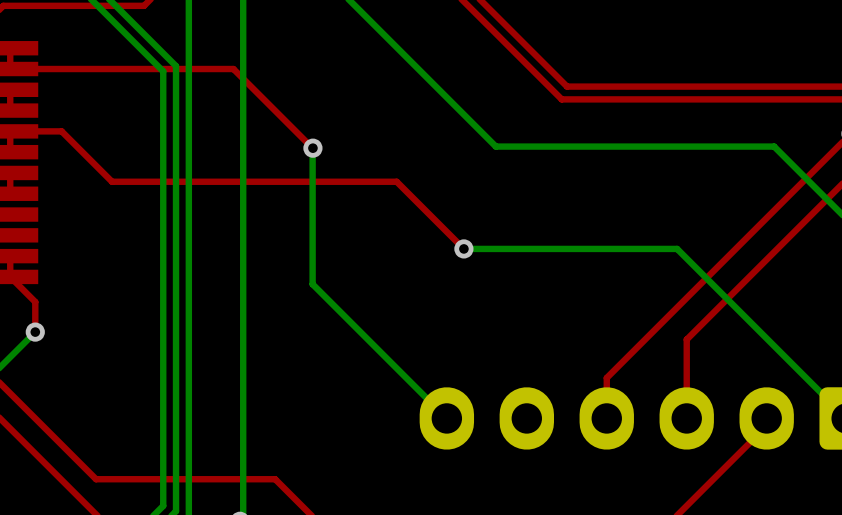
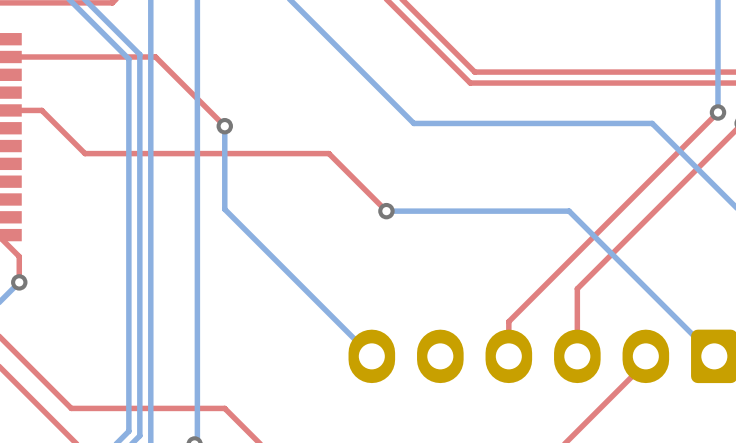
top track: (194, 69) (233, 69) (312, 148) -> (155, 57) (224, 126)
bottom track: (312, 148) (312, 284) -> (224, 126) (224, 209) (256, 241)
via position: (312, 148) -> (224, 126)

